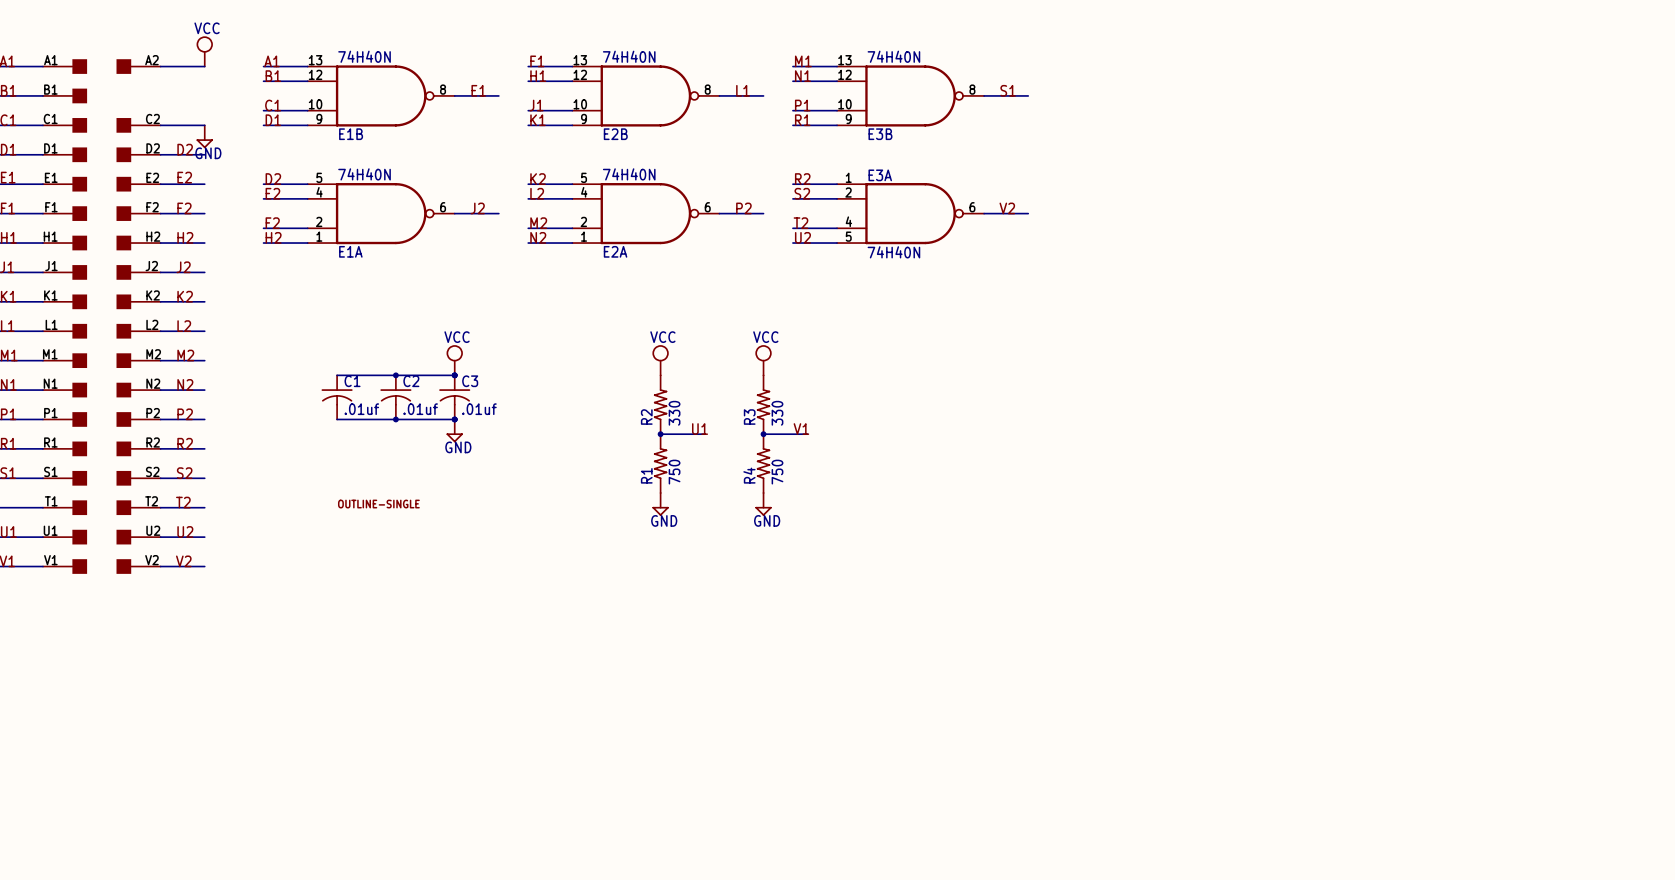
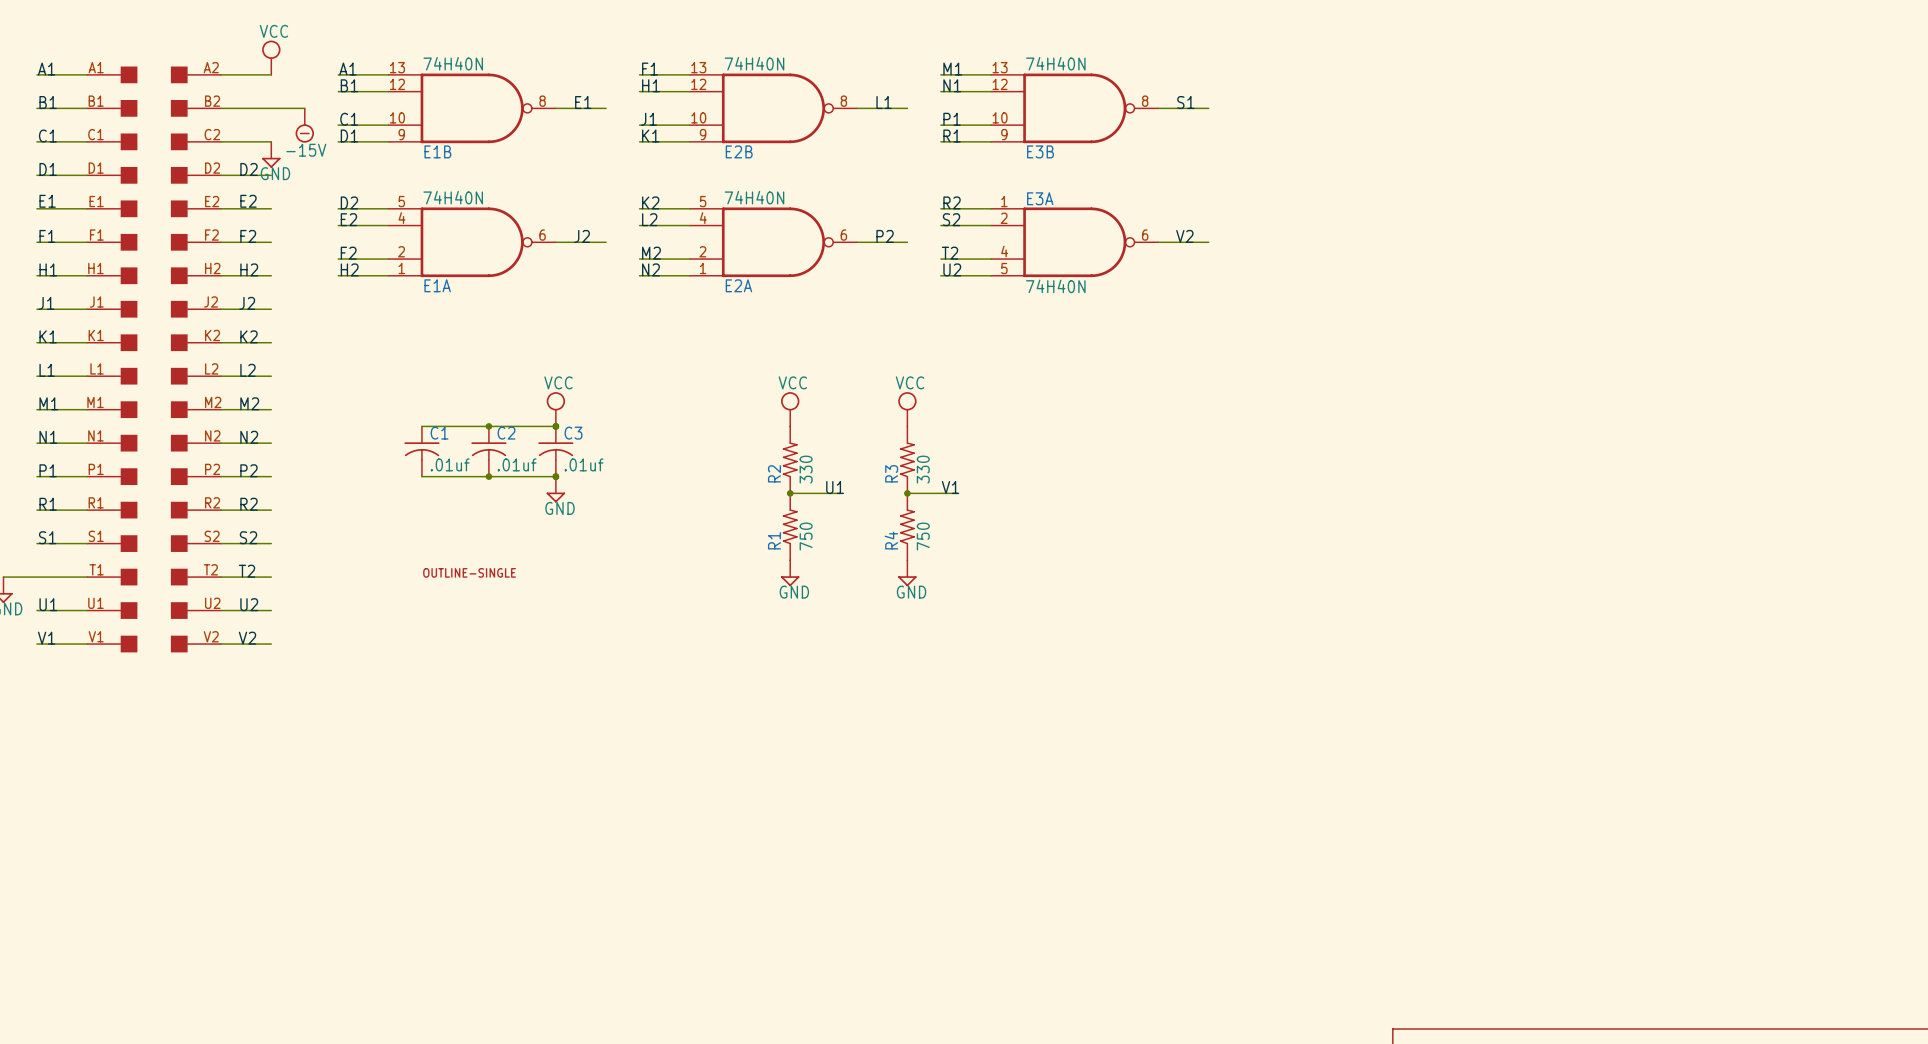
part: none -> (195, 108)
wire: none -> (221, 108) (304, 108)
power symbol: none -> -15V (304, 125)

